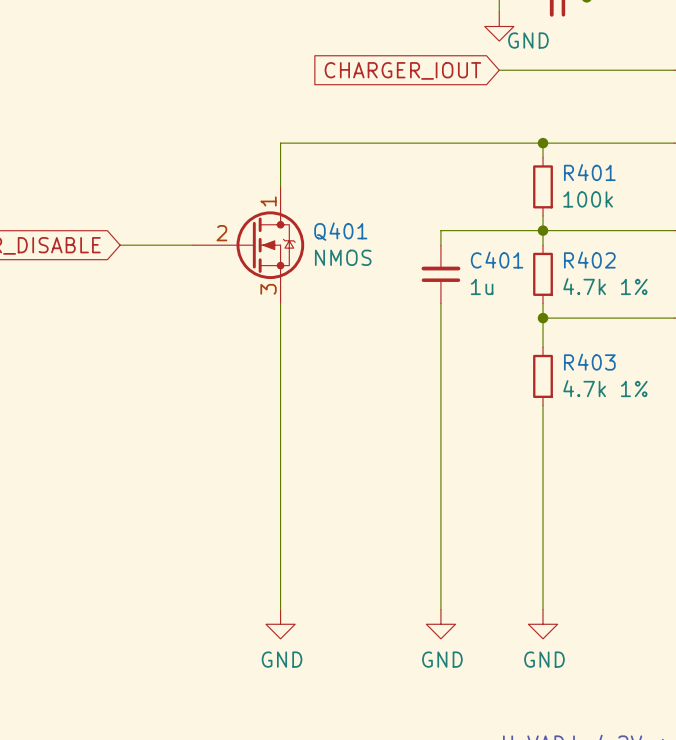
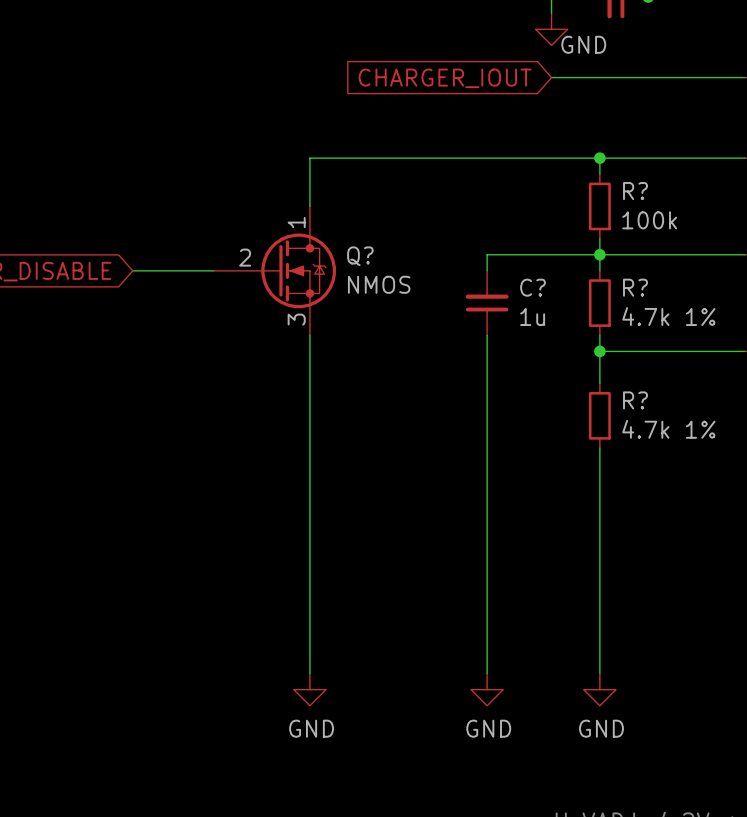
R401 name: R401 (589, 172) -> R? (635, 191)
Q401 name: Q401 (340, 231) -> Q? (360, 256)
C401 name: C401 (497, 260) -> C? (532, 287)
R402 name: R402 (589, 260) -> R? (635, 287)
R403 name: R403 (589, 362) -> R? (635, 400)

